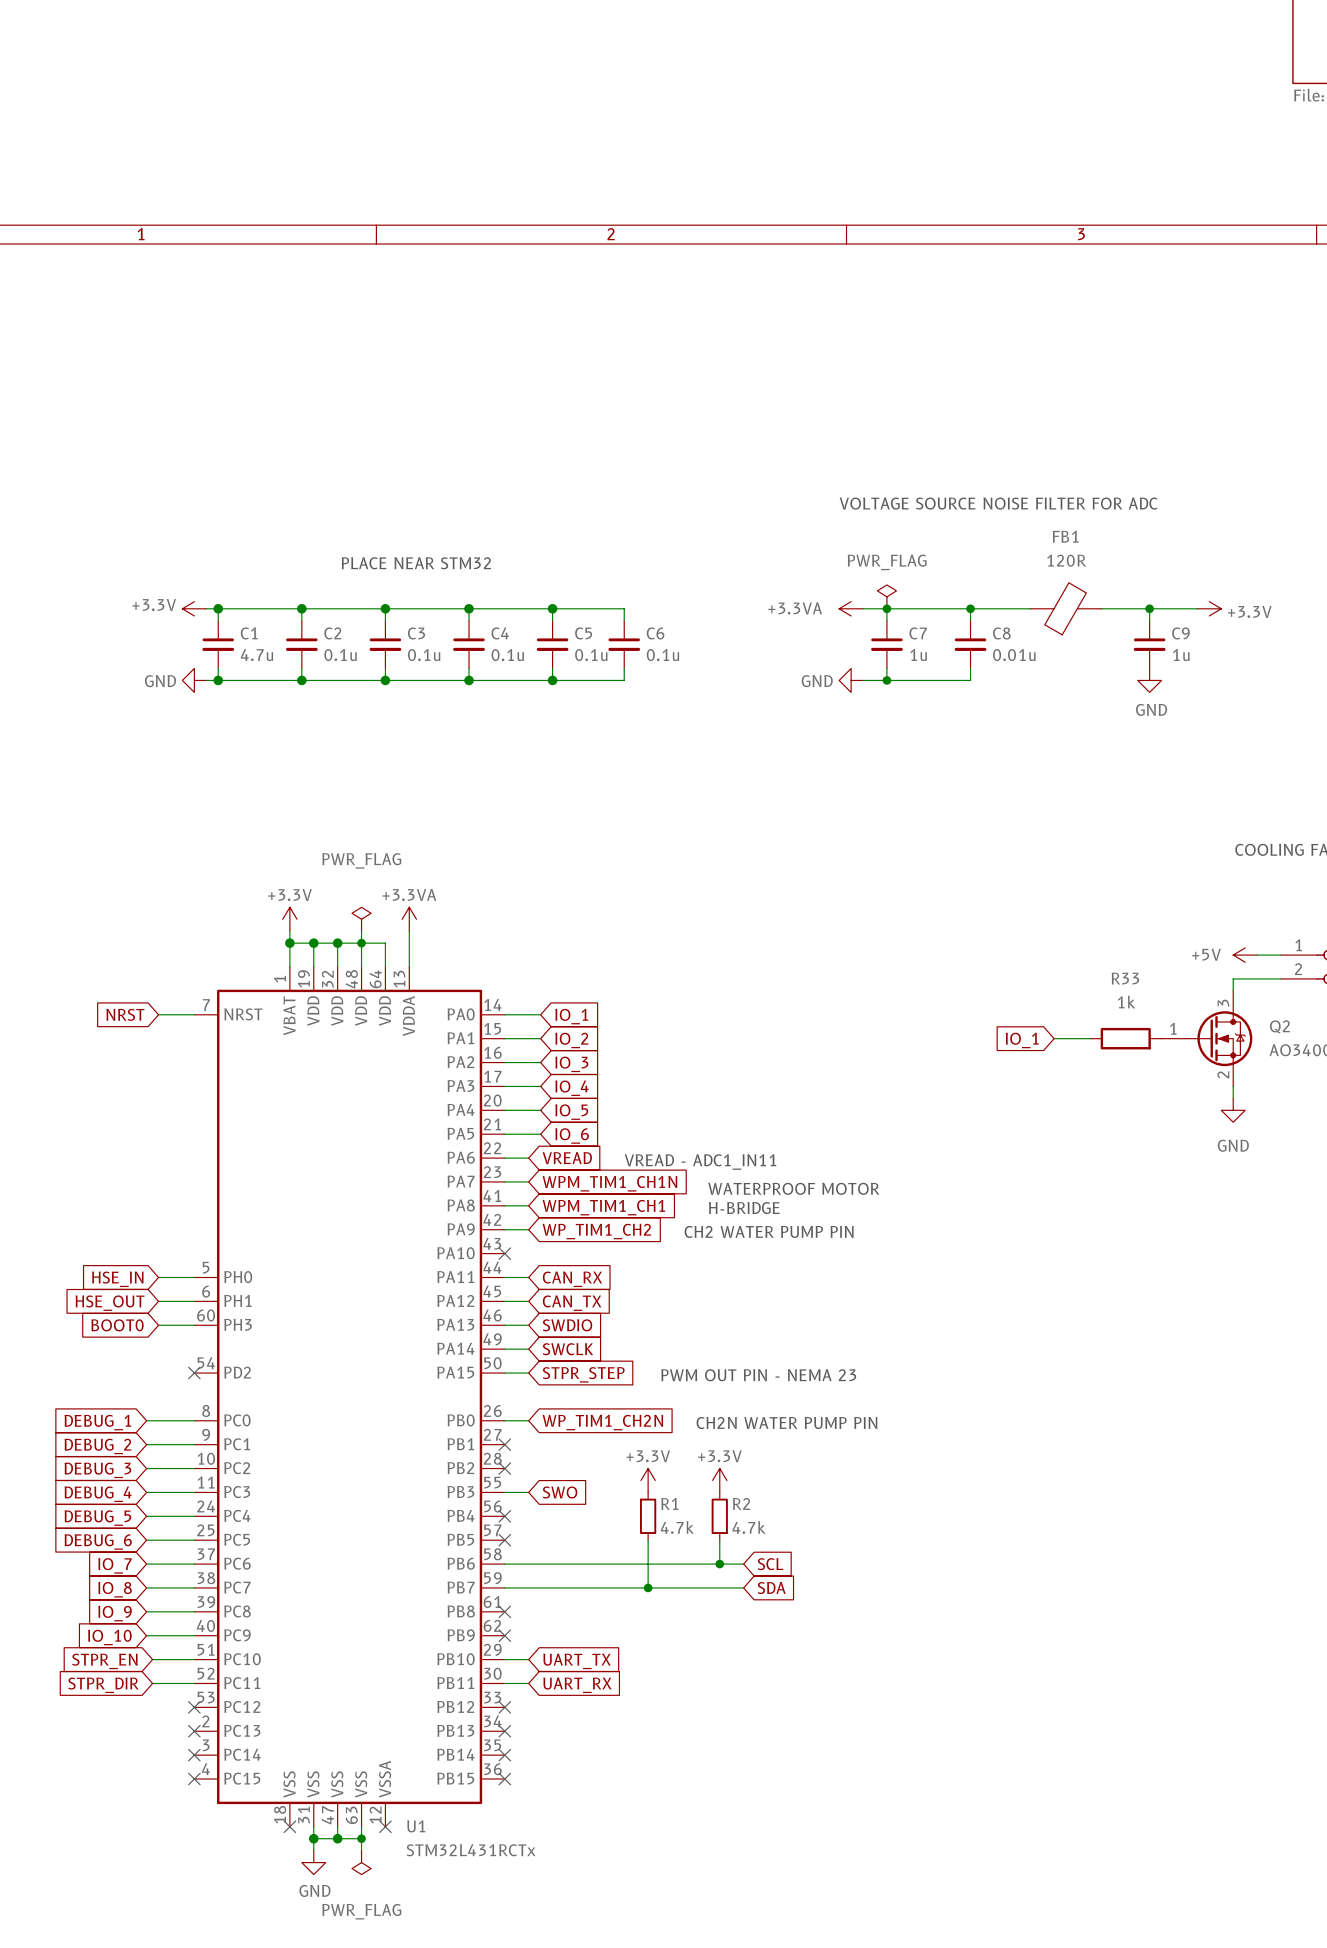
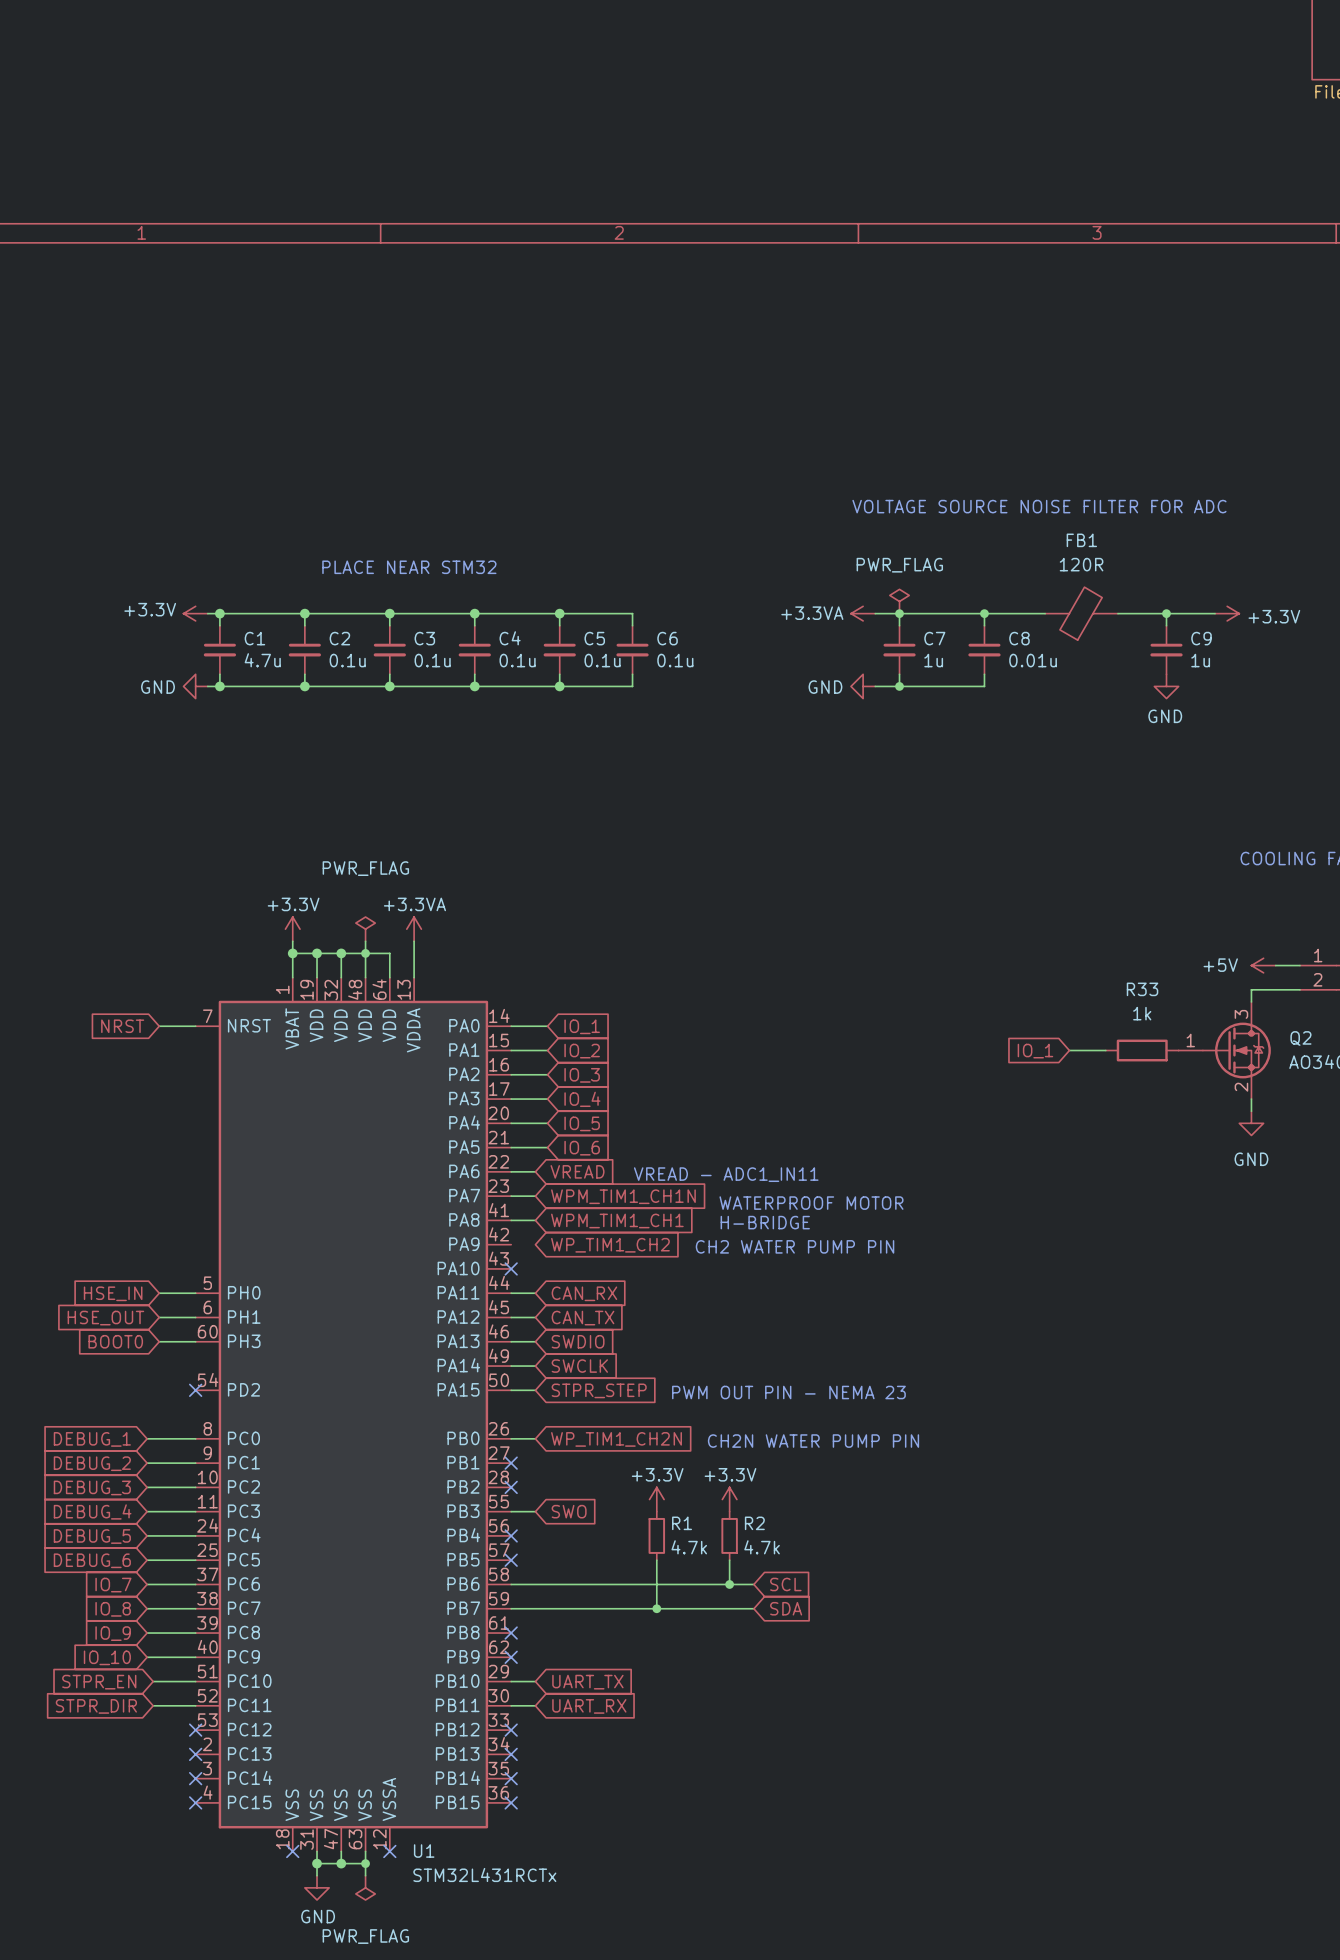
wire: (504, 1229) (528, 1229) -> none

